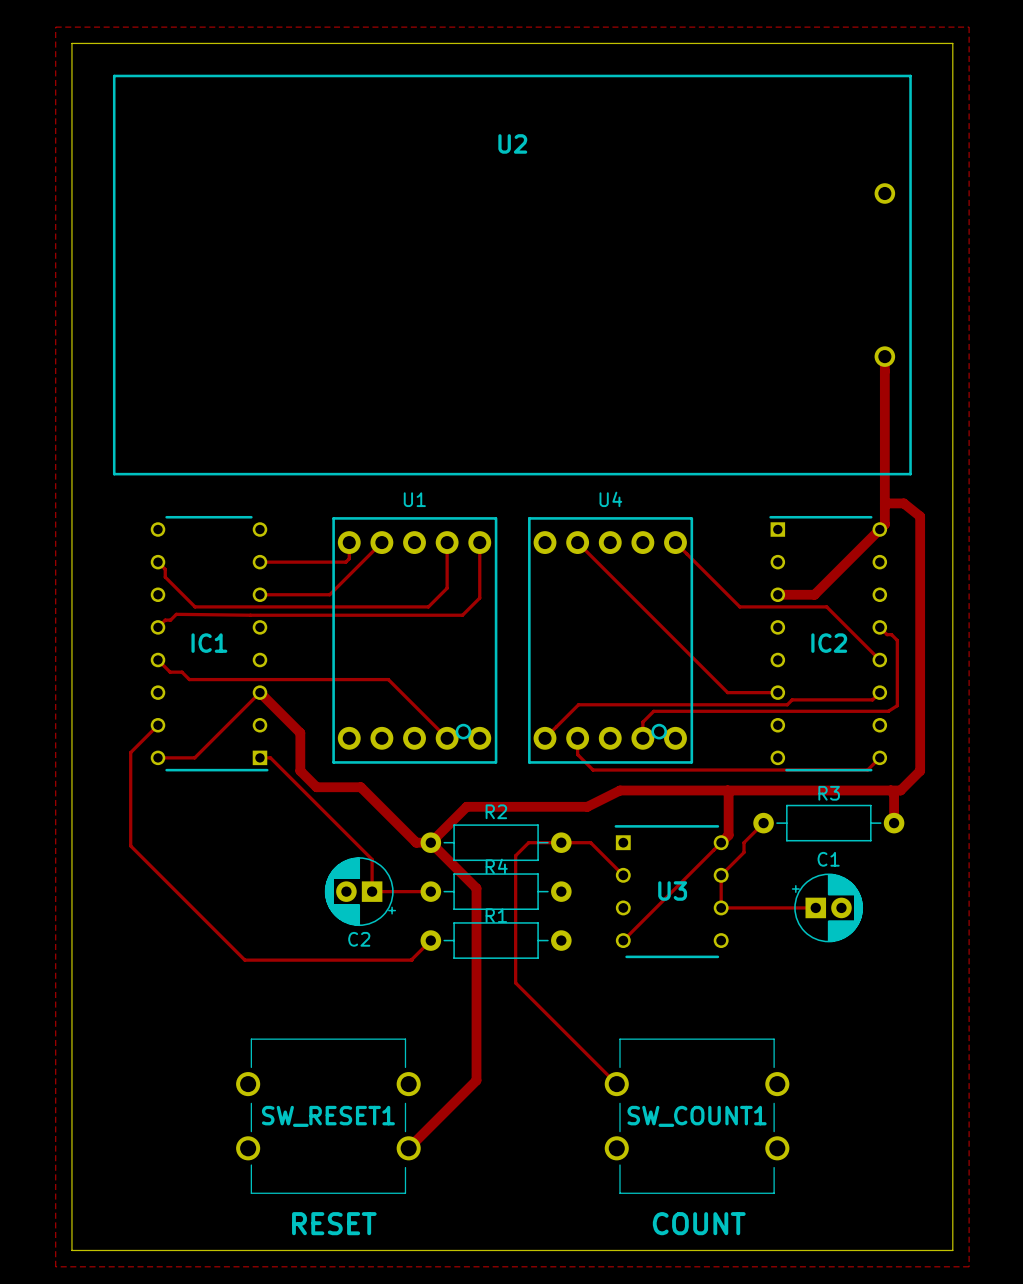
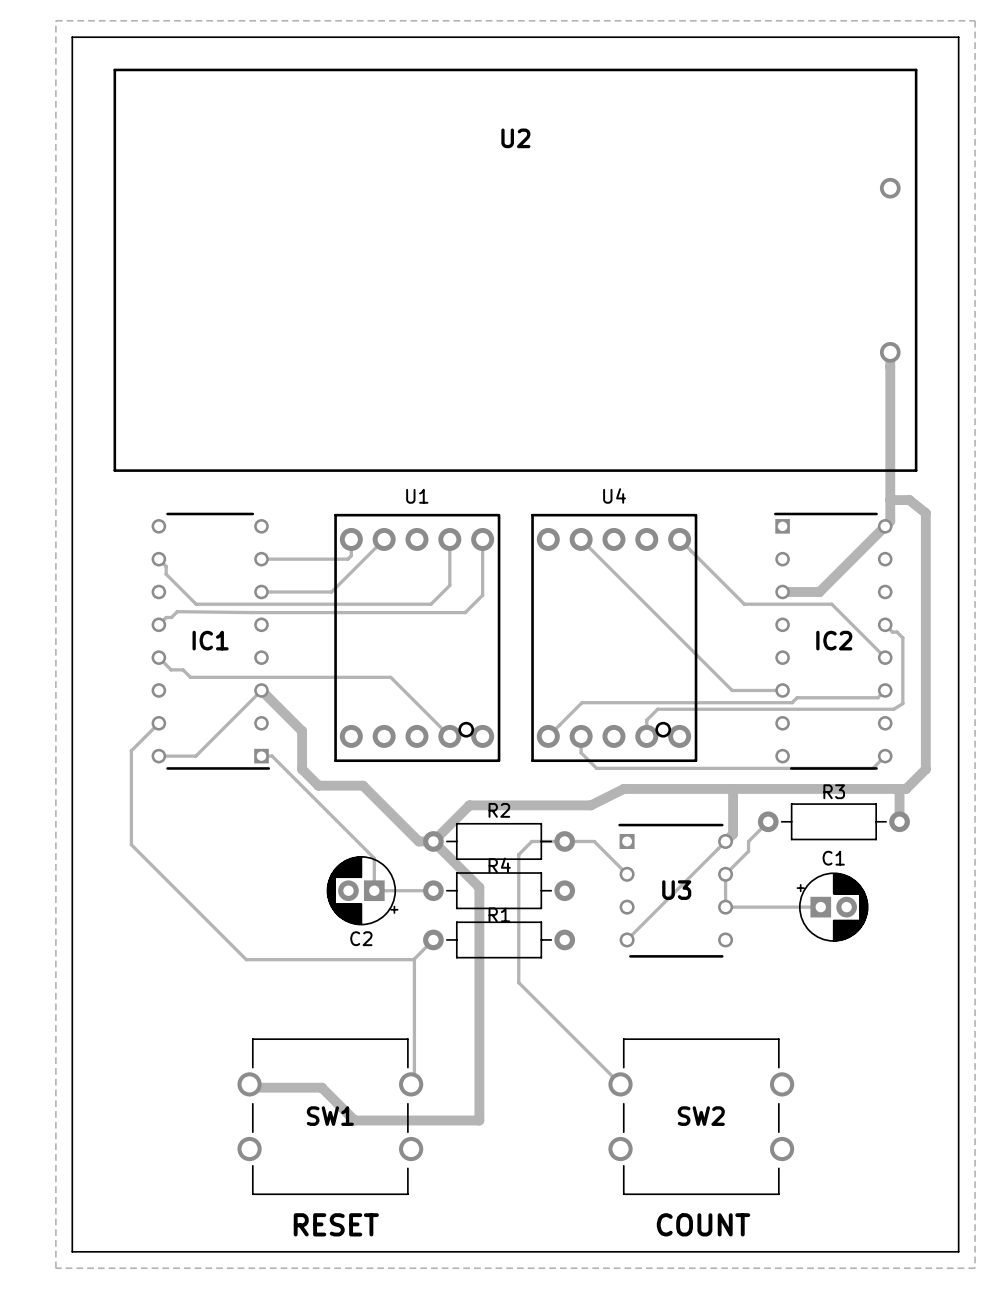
track: none -> (414, 959) (414, 1087)
track: (476, 1080) (408, 1148) -> (479, 1080) (479, 1120) (354, 1120) (321, 1087) (252, 1087)
SW_RESET1 name: SW_RESET1 (328, 1116) -> SW1 (330, 1116)
SW_COUNT1 name: SW_COUNT1 (697, 1116) -> SW2 (701, 1116)

